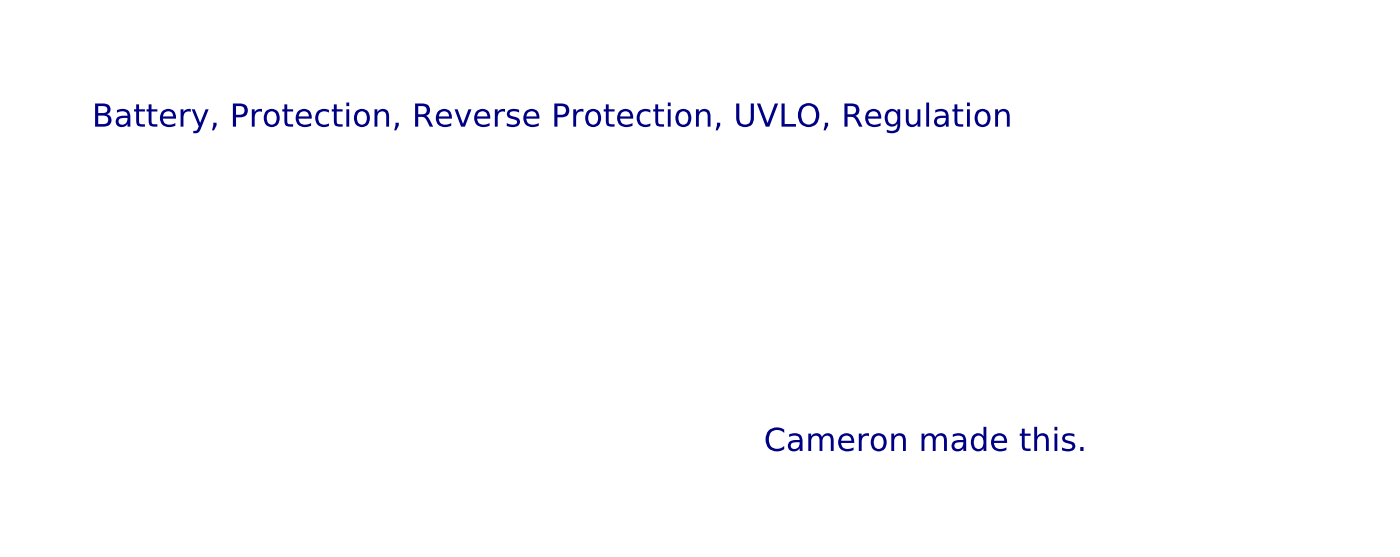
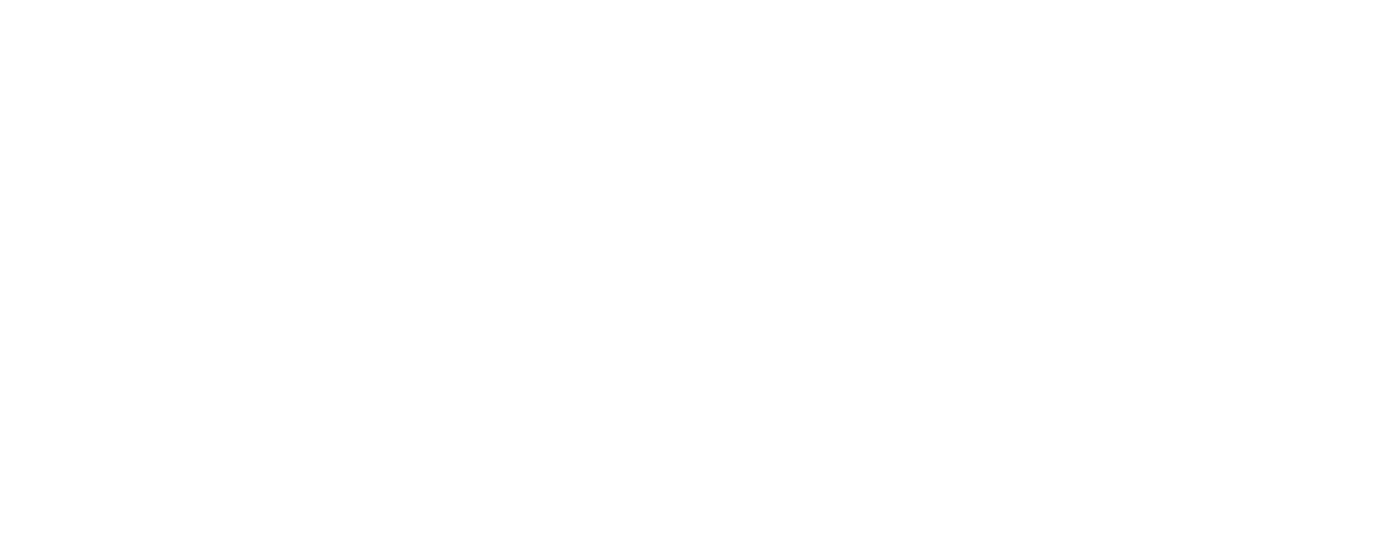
text: Battery, Protection, Reverse Protection, UVLO, Regulation (552, 117) -> none
text: Cameron made this. (924, 439) -> none

